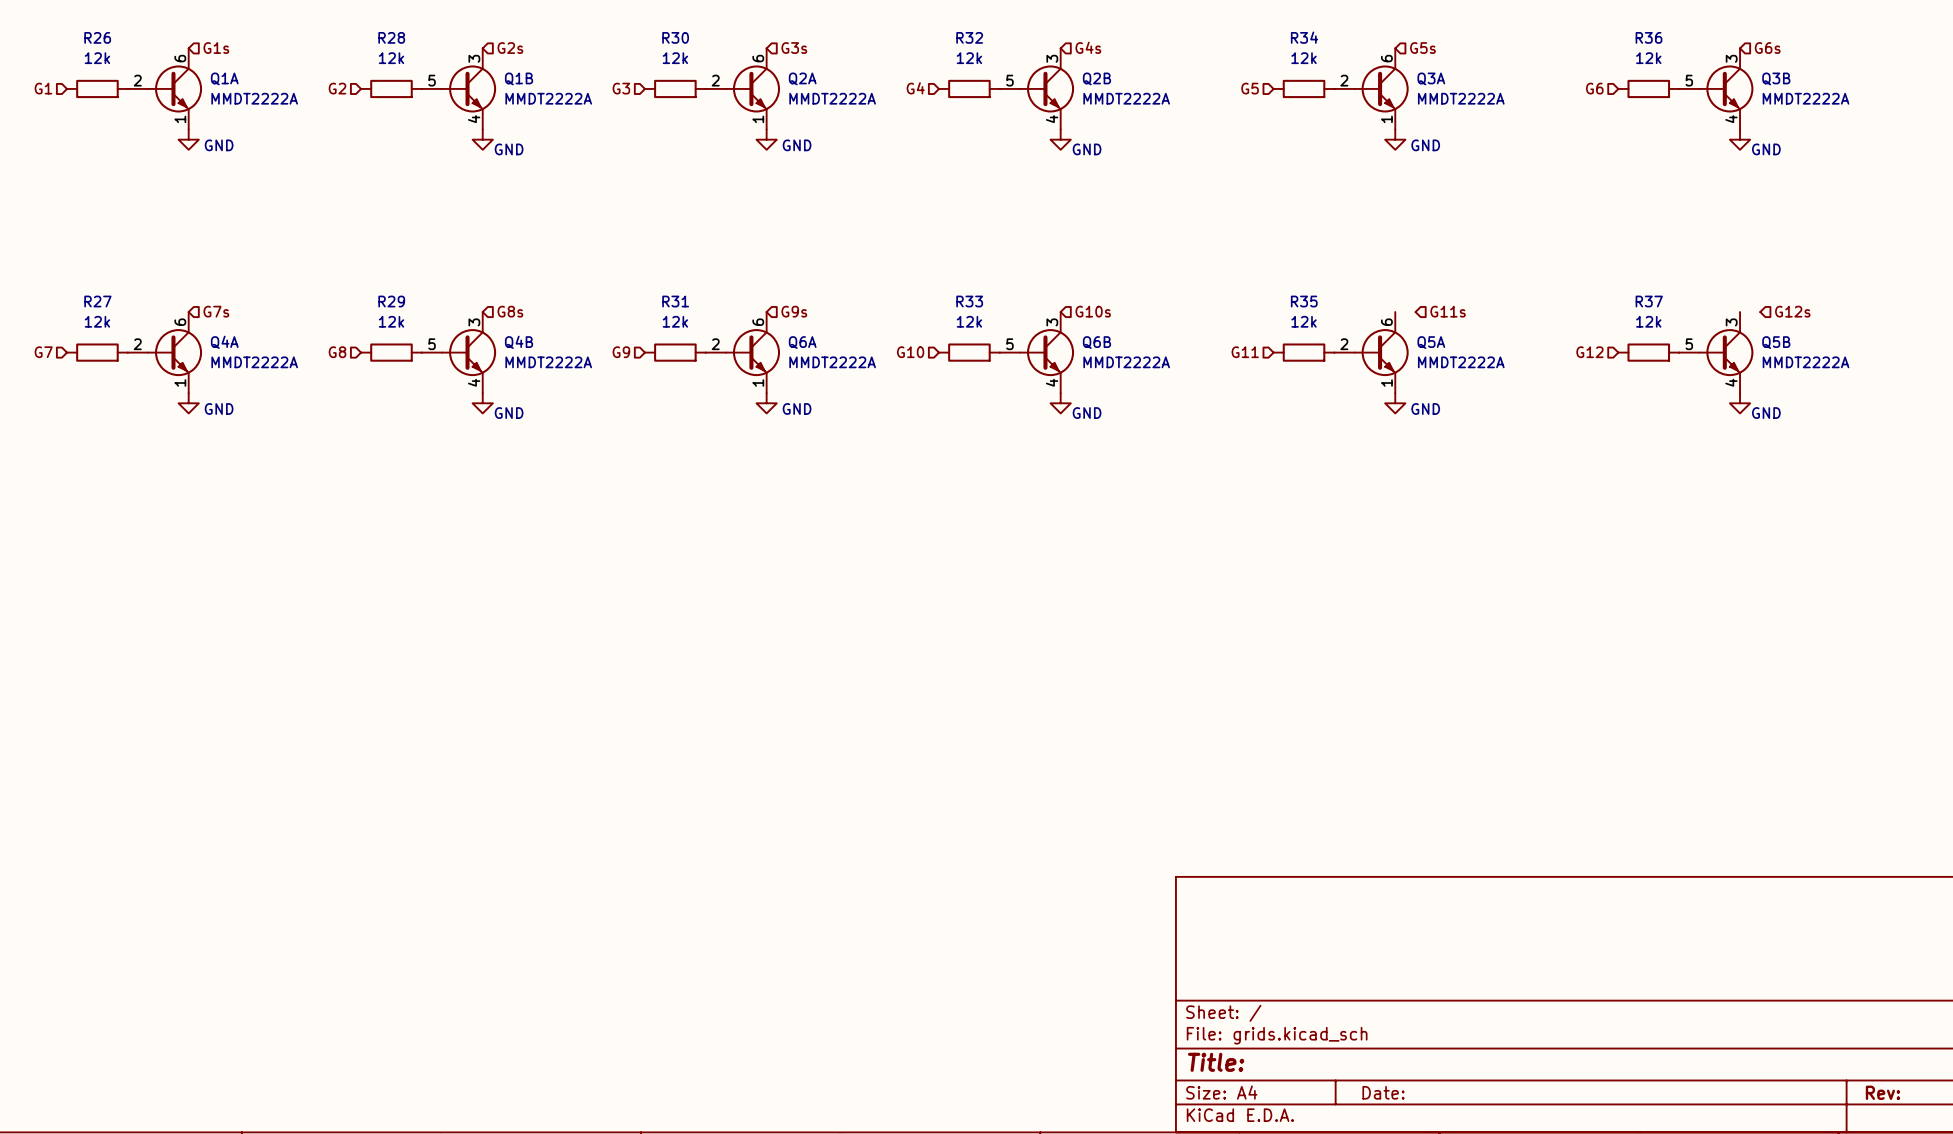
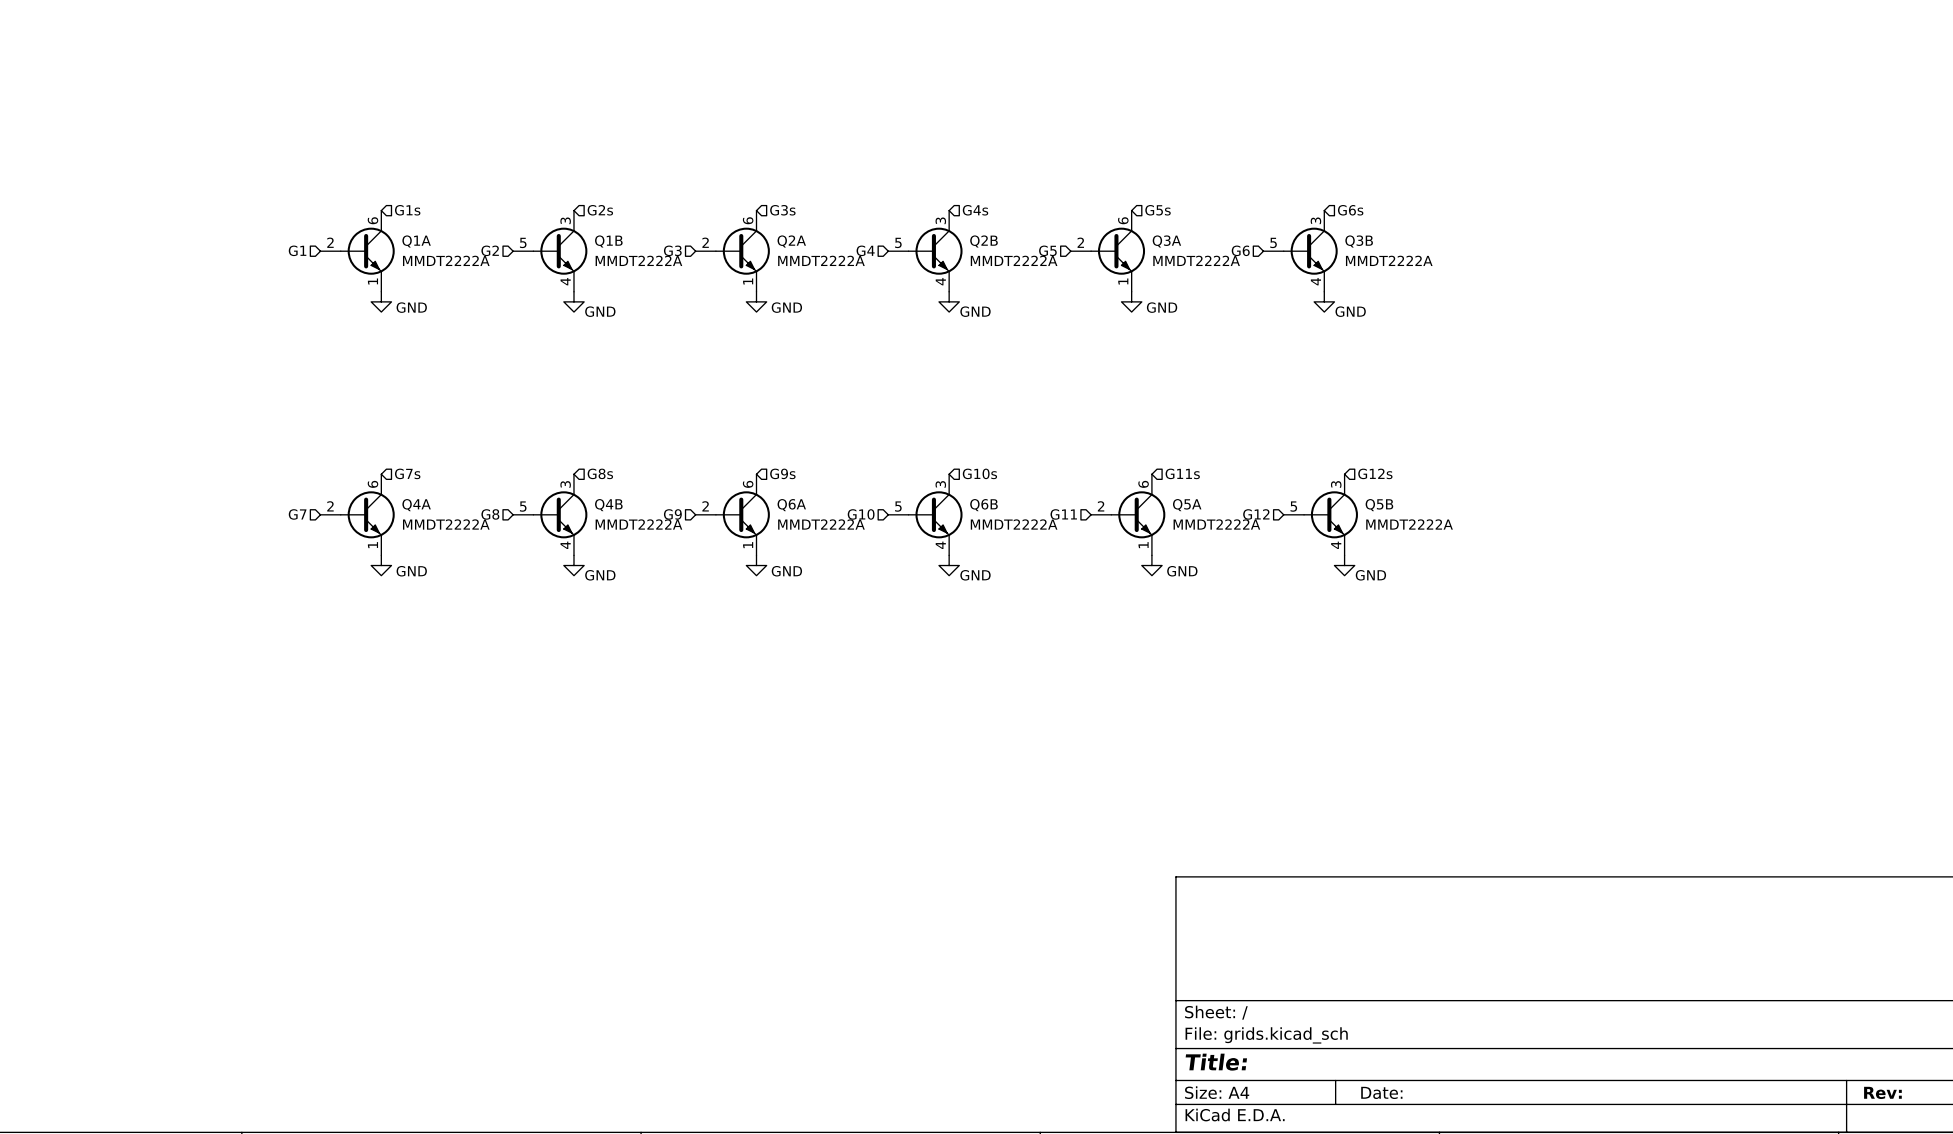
hierarchical label position: G4s (1088, 47) -> G4s (975, 210)
hierarchical label: G1s (216, 48) -> none
hierarchical label position: G2s (510, 48) -> G2s (600, 210)
hierarchical label position: G3s (794, 48) -> G3s (782, 210)
hierarchical label: G5s (1422, 48) -> none
hierarchical label: G6s (1767, 48) -> none
hierarchical label: G1 (43, 88) -> none
R26: 12k (97, 88) -> none
Q1A position: (164, 88) -> (357, 251)
hierarchical label: G2 (337, 88) -> none
R28: 12k (391, 88) -> none
Q1B position: (459, 88) -> (550, 251)
hierarchical label position: G3 (621, 88) -> G3 (672, 250)
R30: 12k (675, 88) -> none
Q2A position: (742, 88) -> (732, 251)
hierarchical label position: G4 (915, 88) -> G4 (865, 250)
R32: 12k (969, 88) -> none
Q2B position: (1036, 88) -> (925, 251)
hierarchical label: G5 (1250, 88) -> none
R34: 12k (1304, 88) -> none
Q3A position: (1371, 88) -> (1107, 251)
hierarchical label: G6 (1594, 88) -> none
R36: 12k (1648, 88) -> none
Q3B position: (1716, 88) -> (1300, 251)
power symbol: GND (188, 139) -> none
power symbol: GND (482, 139) -> none
power symbol: GND (766, 139) -> none
power symbol: GND (1060, 139) -> none
power symbol: GND (1395, 139) -> none
power symbol: GND (1740, 139) -> none
hierarchical label: none -> G1s (407, 210)
hierarchical label: none -> G5s (1158, 210)
hierarchical label: none -> G6s (1350, 210)
hierarchical label: none -> G1 (297, 250)
hierarchical label: none -> G2 (490, 250)
hierarchical label: none -> G5 (1047, 250)
hierarchical label: none -> G6 (1240, 250)
power symbol: none -> GND (381, 301)
power symbol: none -> GND (573, 301)
power symbol: none -> GND (756, 301)
power symbol: none -> GND (949, 301)
power symbol: none -> GND (1131, 301)
power symbol: none -> GND (1324, 301)
hierarchical label: G7s (216, 311) -> none
hierarchical label position: G8s (510, 311) -> G8s (600, 473)
hierarchical label position: G9s (794, 311) -> G9s (782, 473)
hierarchical label position: G10s (1093, 311) -> G10s (979, 473)
hierarchical label: G11s (1448, 311) -> none
hierarchical label: G12s (1792, 311) -> none
hierarchical label: G7 (43, 352) -> none
R27: 12k (97, 352) -> none
Q4A position: (164, 352) -> (357, 514)
hierarchical label: G8 (337, 352) -> none
R29: 12k (391, 352) -> none
Q4B position: (459, 352) -> (550, 514)
hierarchical label position: G9 (621, 352) -> G9 (672, 514)
R31: 12k (675, 352) -> none
Q6A position: (742, 352) -> (732, 514)
hierarchical label position: G10 (910, 352) -> G10 (861, 514)
R33: 12k (969, 352) -> none
Q6B position: (1036, 352) -> (925, 514)
hierarchical label: G11 (1245, 352) -> none
R35: 12k (1304, 352) -> none
Q5A position: (1371, 352) -> (1128, 514)
hierarchical label: G12 (1589, 352) -> none
R37: 12k (1648, 352) -> none
Q5B position: (1716, 352) -> (1320, 514)
power symbol: GND (188, 403) -> none
power symbol: GND (482, 403) -> none
power symbol: GND (766, 403) -> none
power symbol: GND (1060, 403) -> none
power symbol: GND (1395, 403) -> none
power symbol: GND (1740, 403) -> none
hierarchical label: none -> G7s (407, 473)
hierarchical label: none -> G11s (1182, 473)
hierarchical label: none -> G12s (1375, 473)
hierarchical label: none -> G7 (297, 514)
hierarchical label: none -> G8 (490, 514)
hierarchical label: none -> G11 (1063, 514)
hierarchical label: none -> G12 (1256, 514)
power symbol: none -> GND (381, 565)
power symbol: none -> GND (573, 565)
power symbol: none -> GND (756, 565)
power symbol: none -> GND (949, 565)
power symbol: none -> GND (1151, 565)
power symbol: none -> GND (1344, 565)

